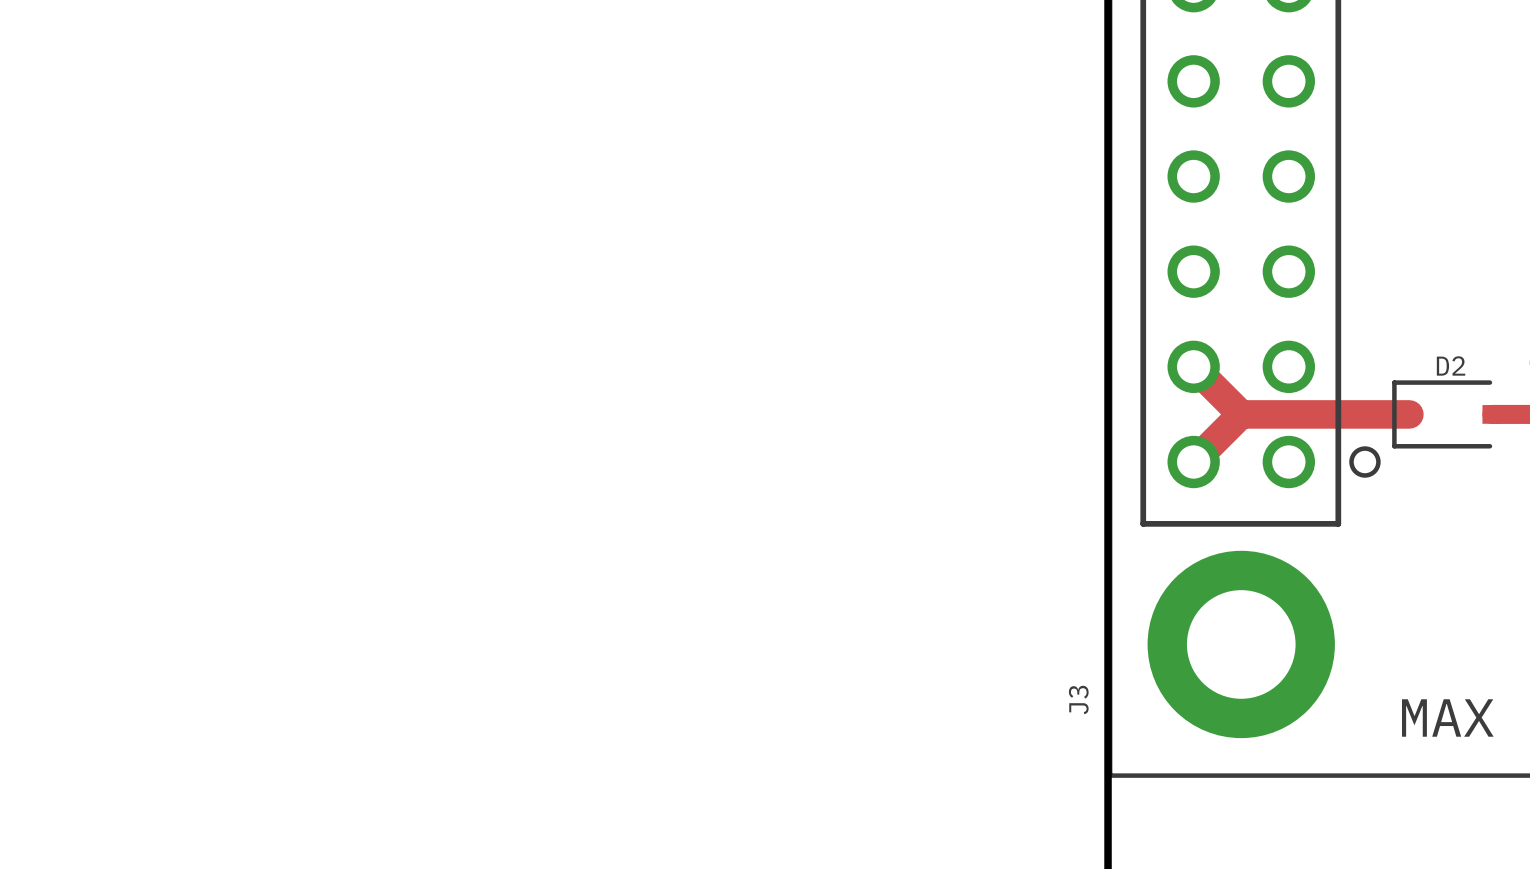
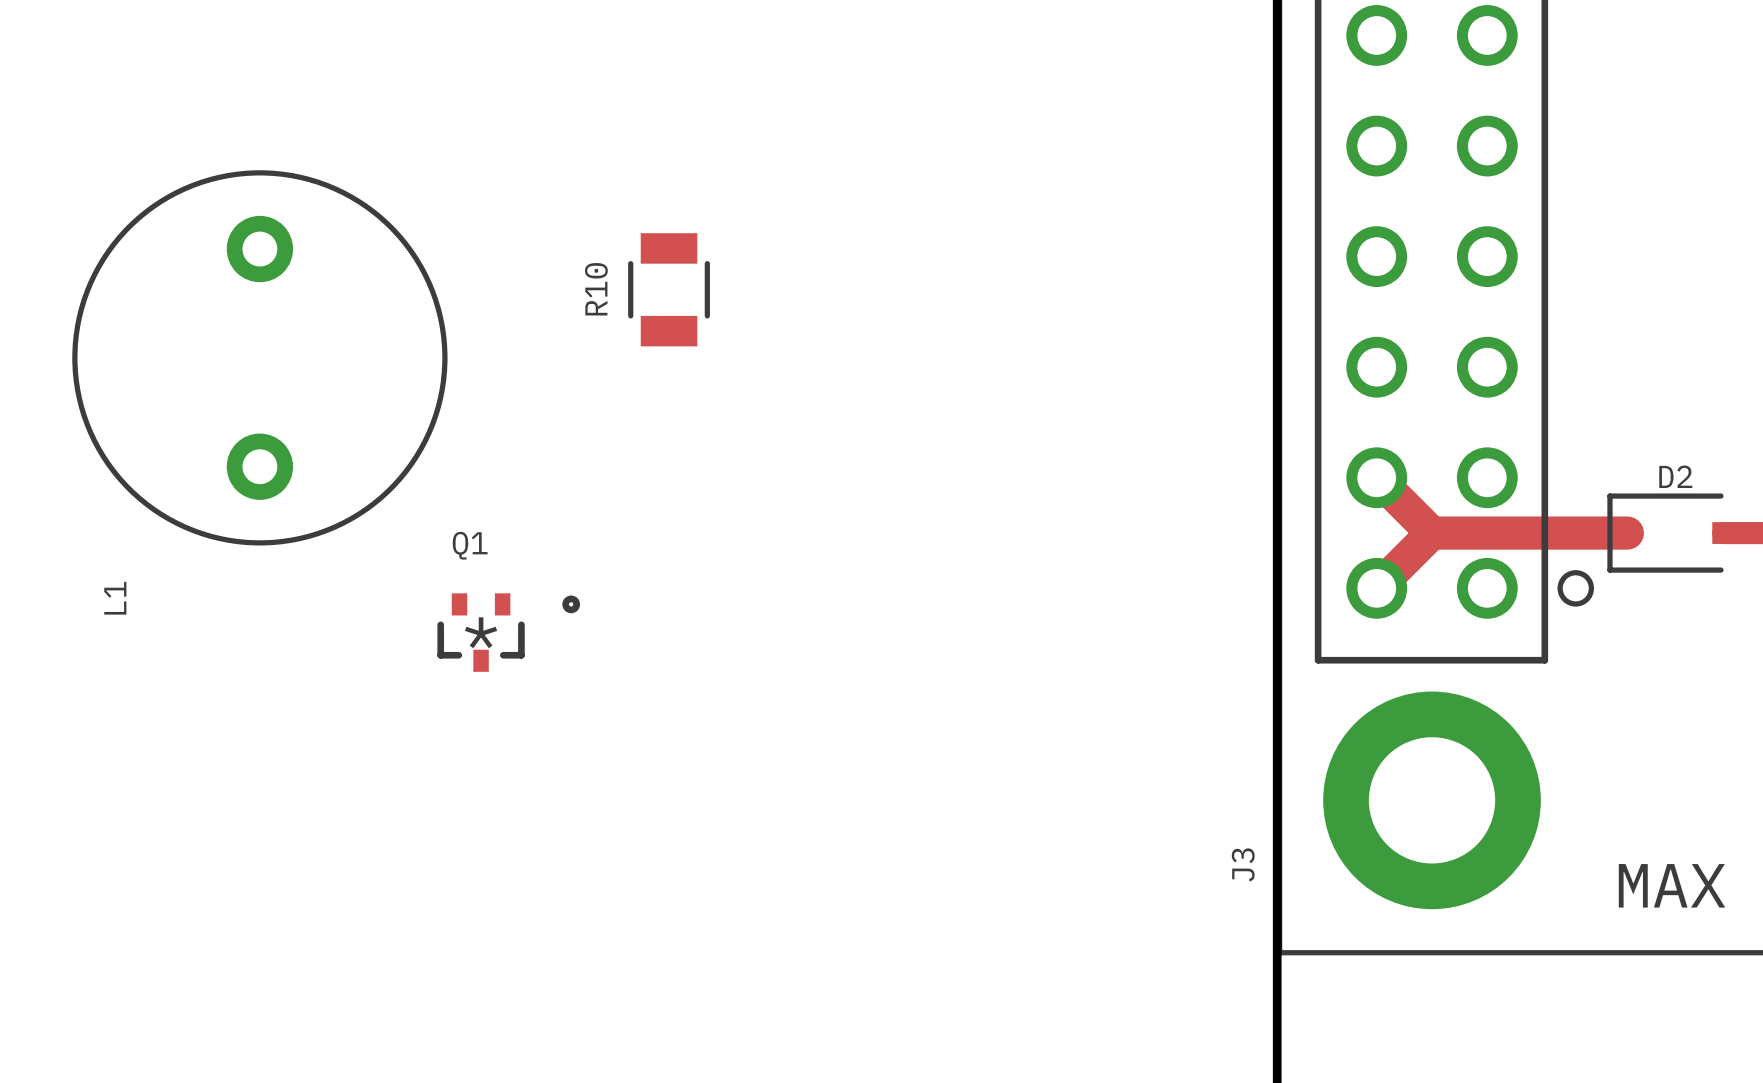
R10: none -> (669, 289)
L1: none -> (259, 357)
Q1: none -> (508, 632)

